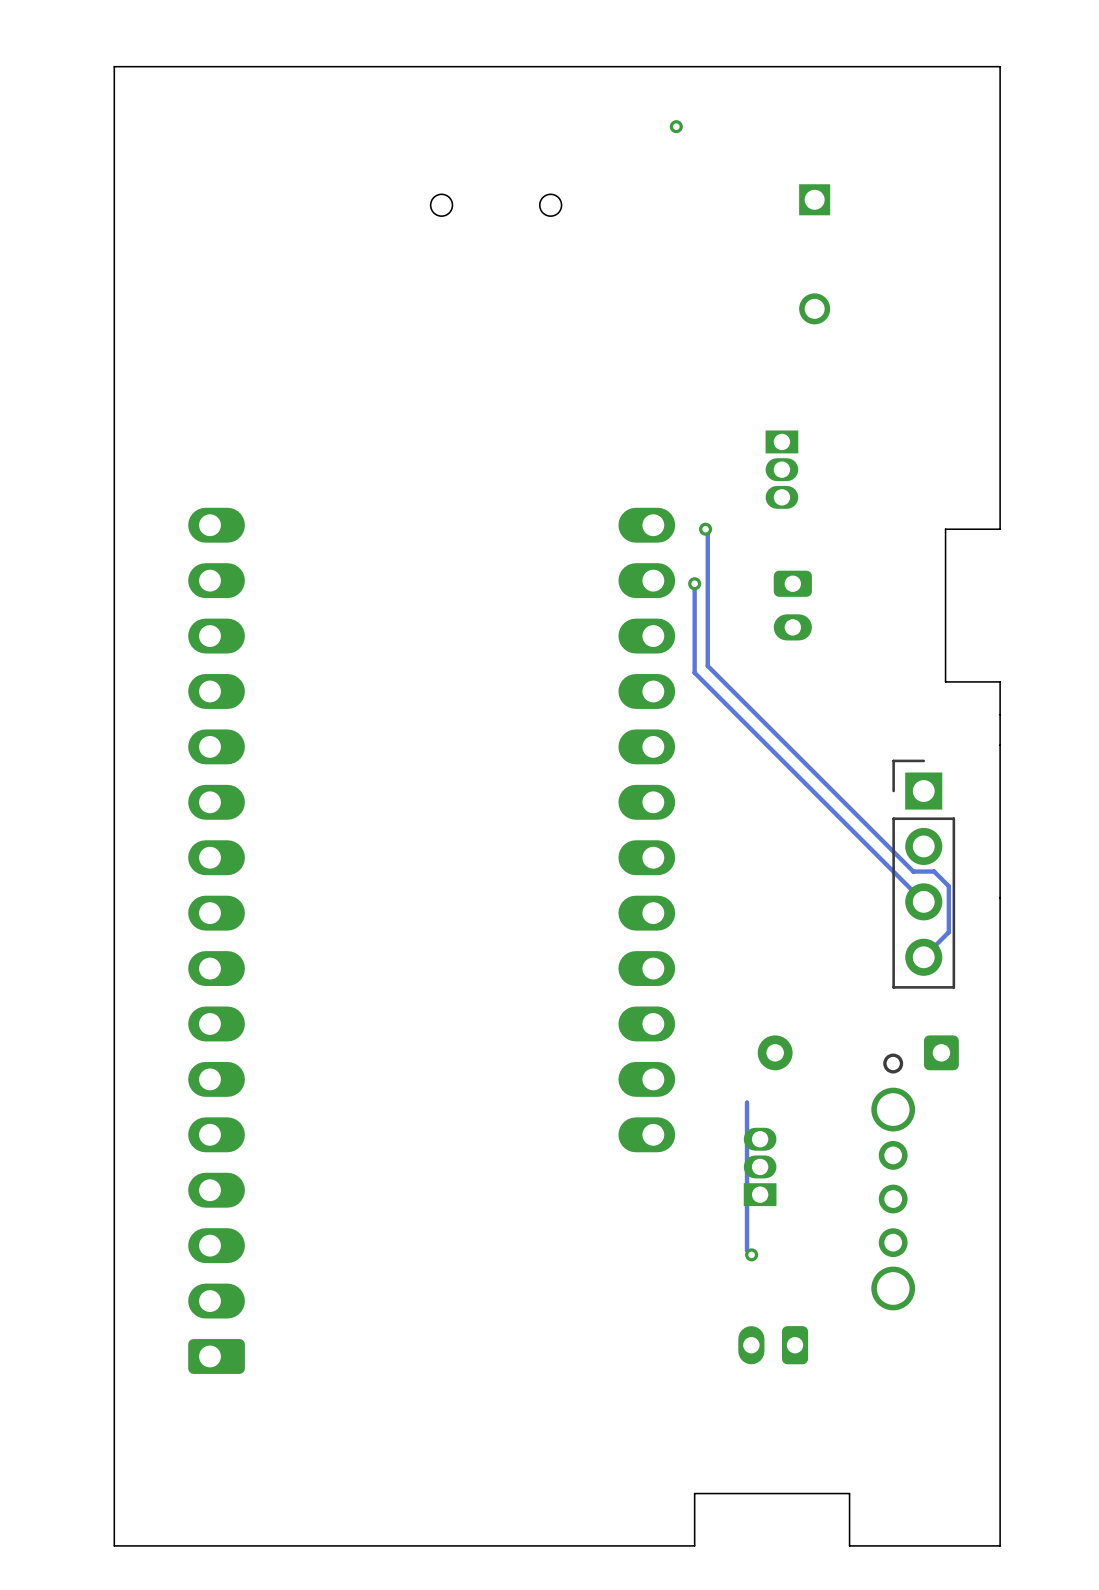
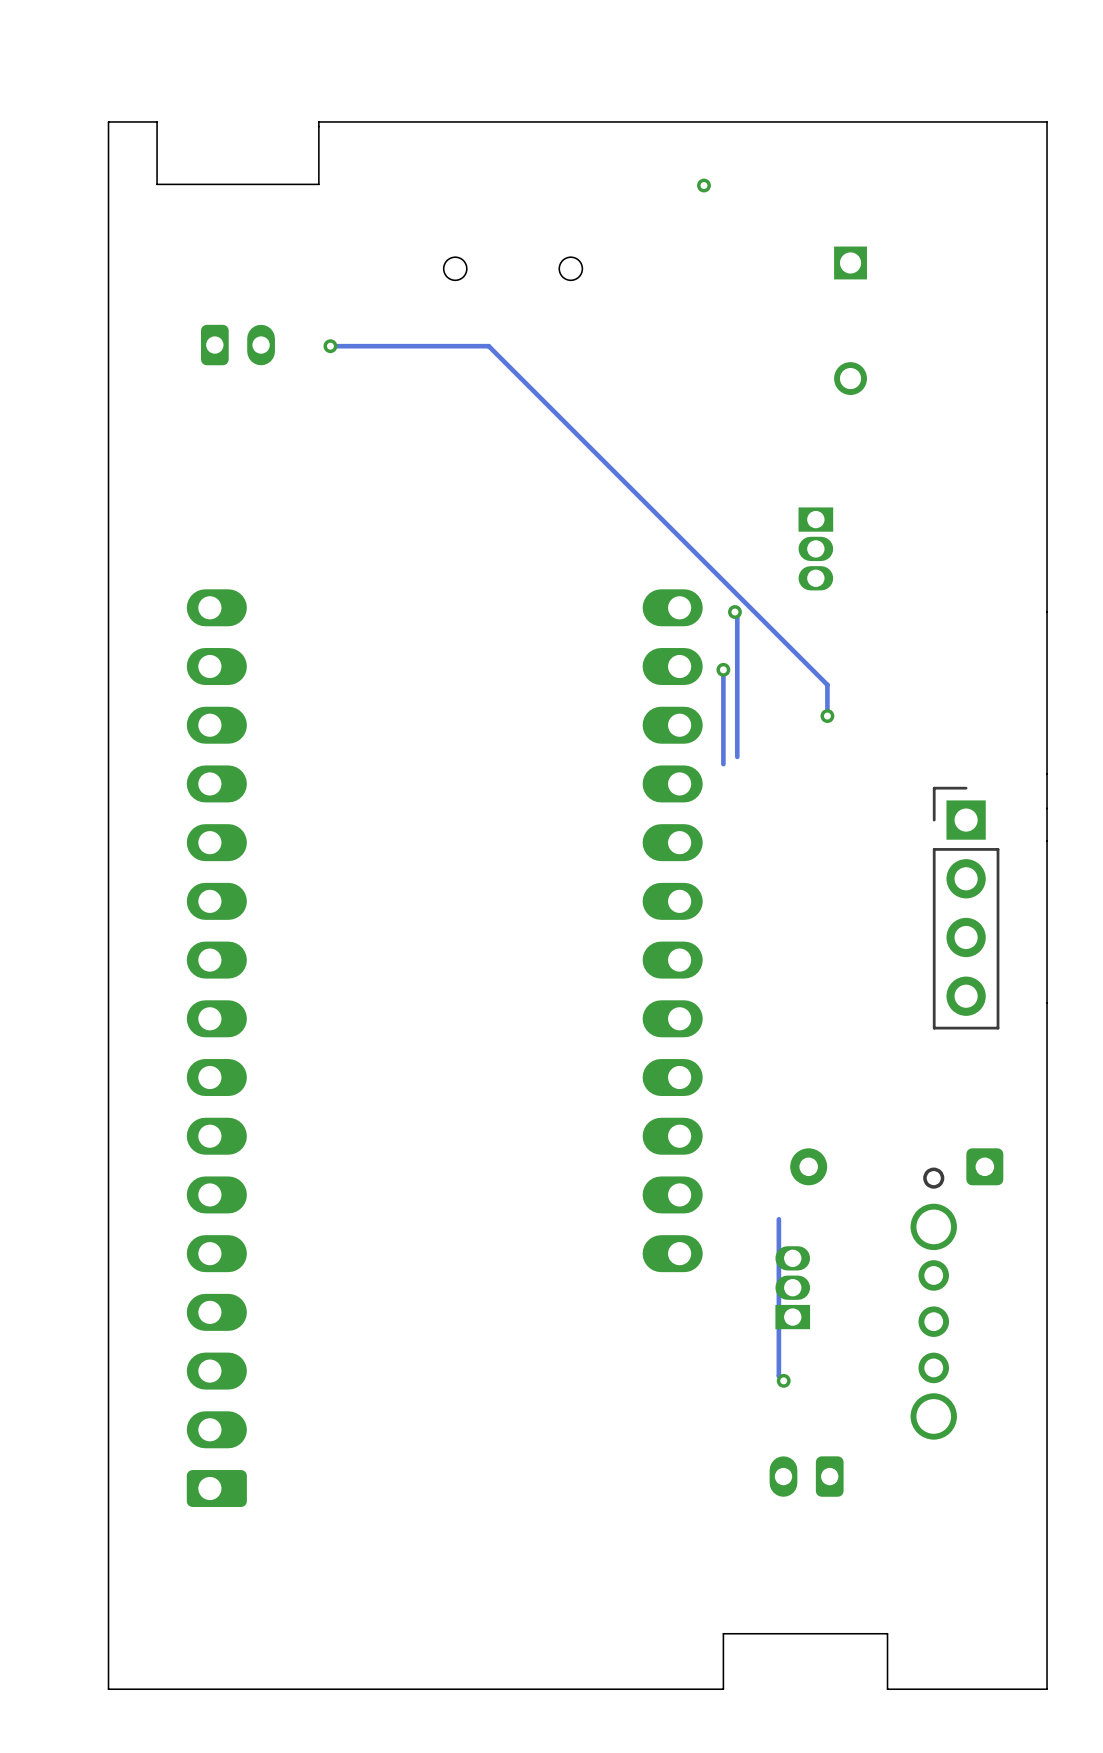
board edge: (312, 66) (160, 66) -> (318, 121) (318, 184) (157, 184) (157, 121)
part: none -> (237, 345)
track: none -> (330, 346) (488, 346) (827, 684) (827, 716)
via: none -> (330, 346)
board edge: (1000, 529) (945, 529) (945, 681) (1000, 681) -> (1047, 612) (1047, 773)
part: (792, 605) -> none
via: none -> (827, 716)
track: (707, 665) (913, 871) (934, 871) (948, 886) (948, 932) (923, 957) -> none
track: (694, 672) (923, 901) -> none
part position: (923, 874) -> (966, 908)

